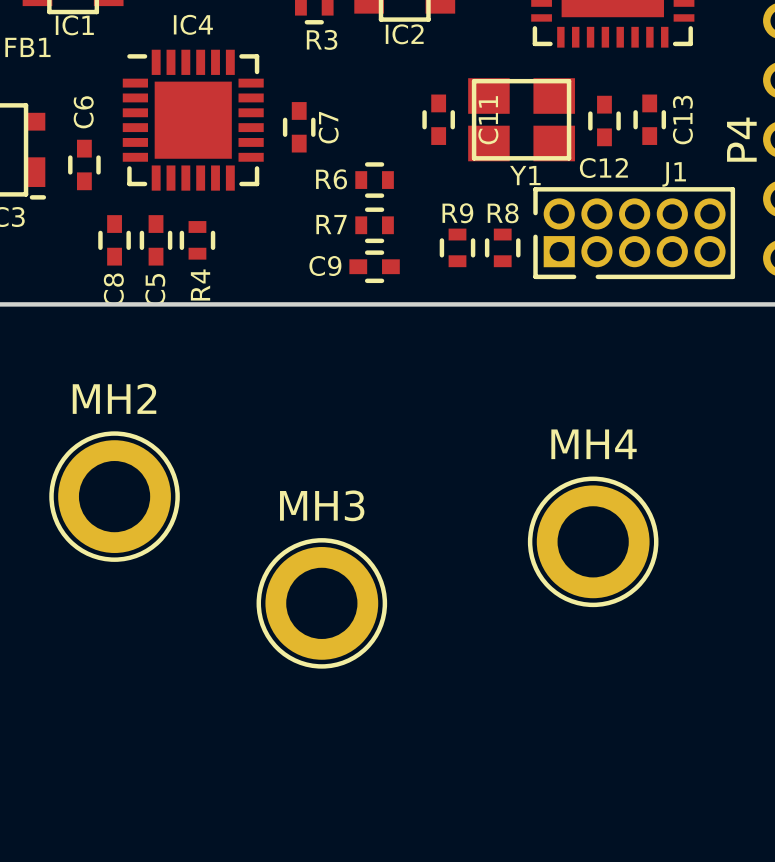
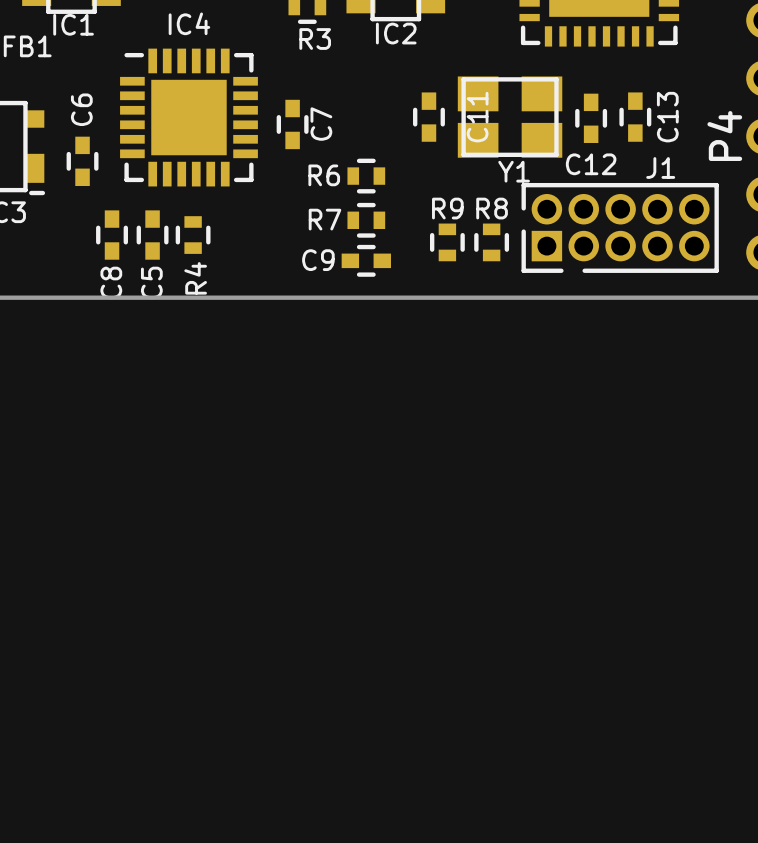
MH2: (114, 496) -> none
MH4: (593, 541) -> none
MH3: (321, 603) -> none

